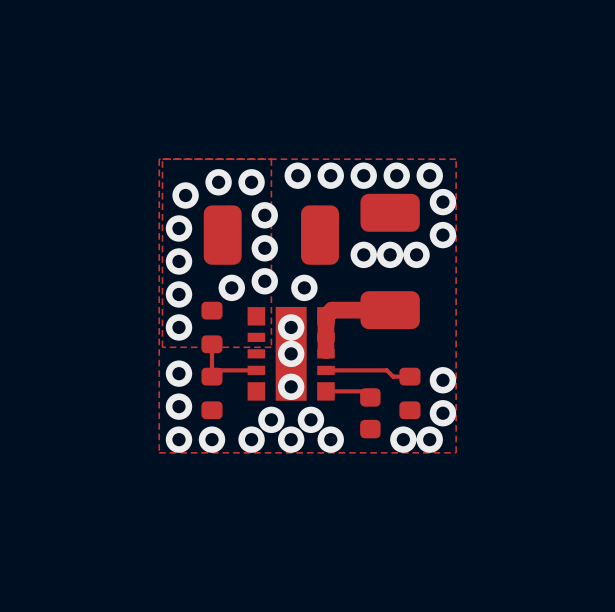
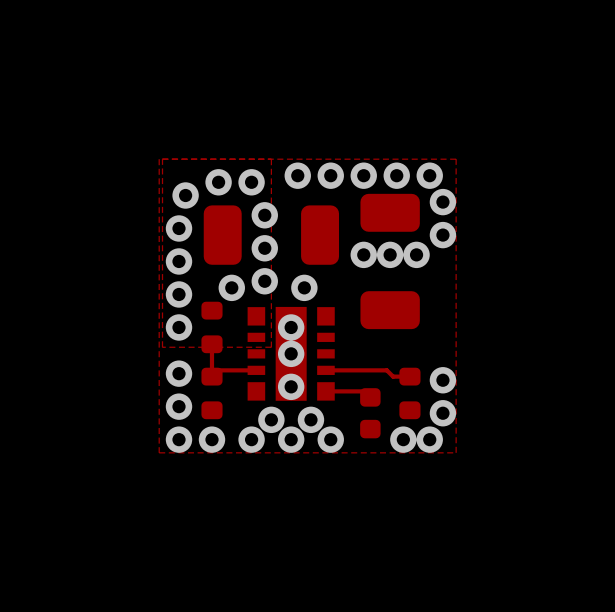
top track: (390, 310) (332, 310) (325, 316) (325, 350) -> none

